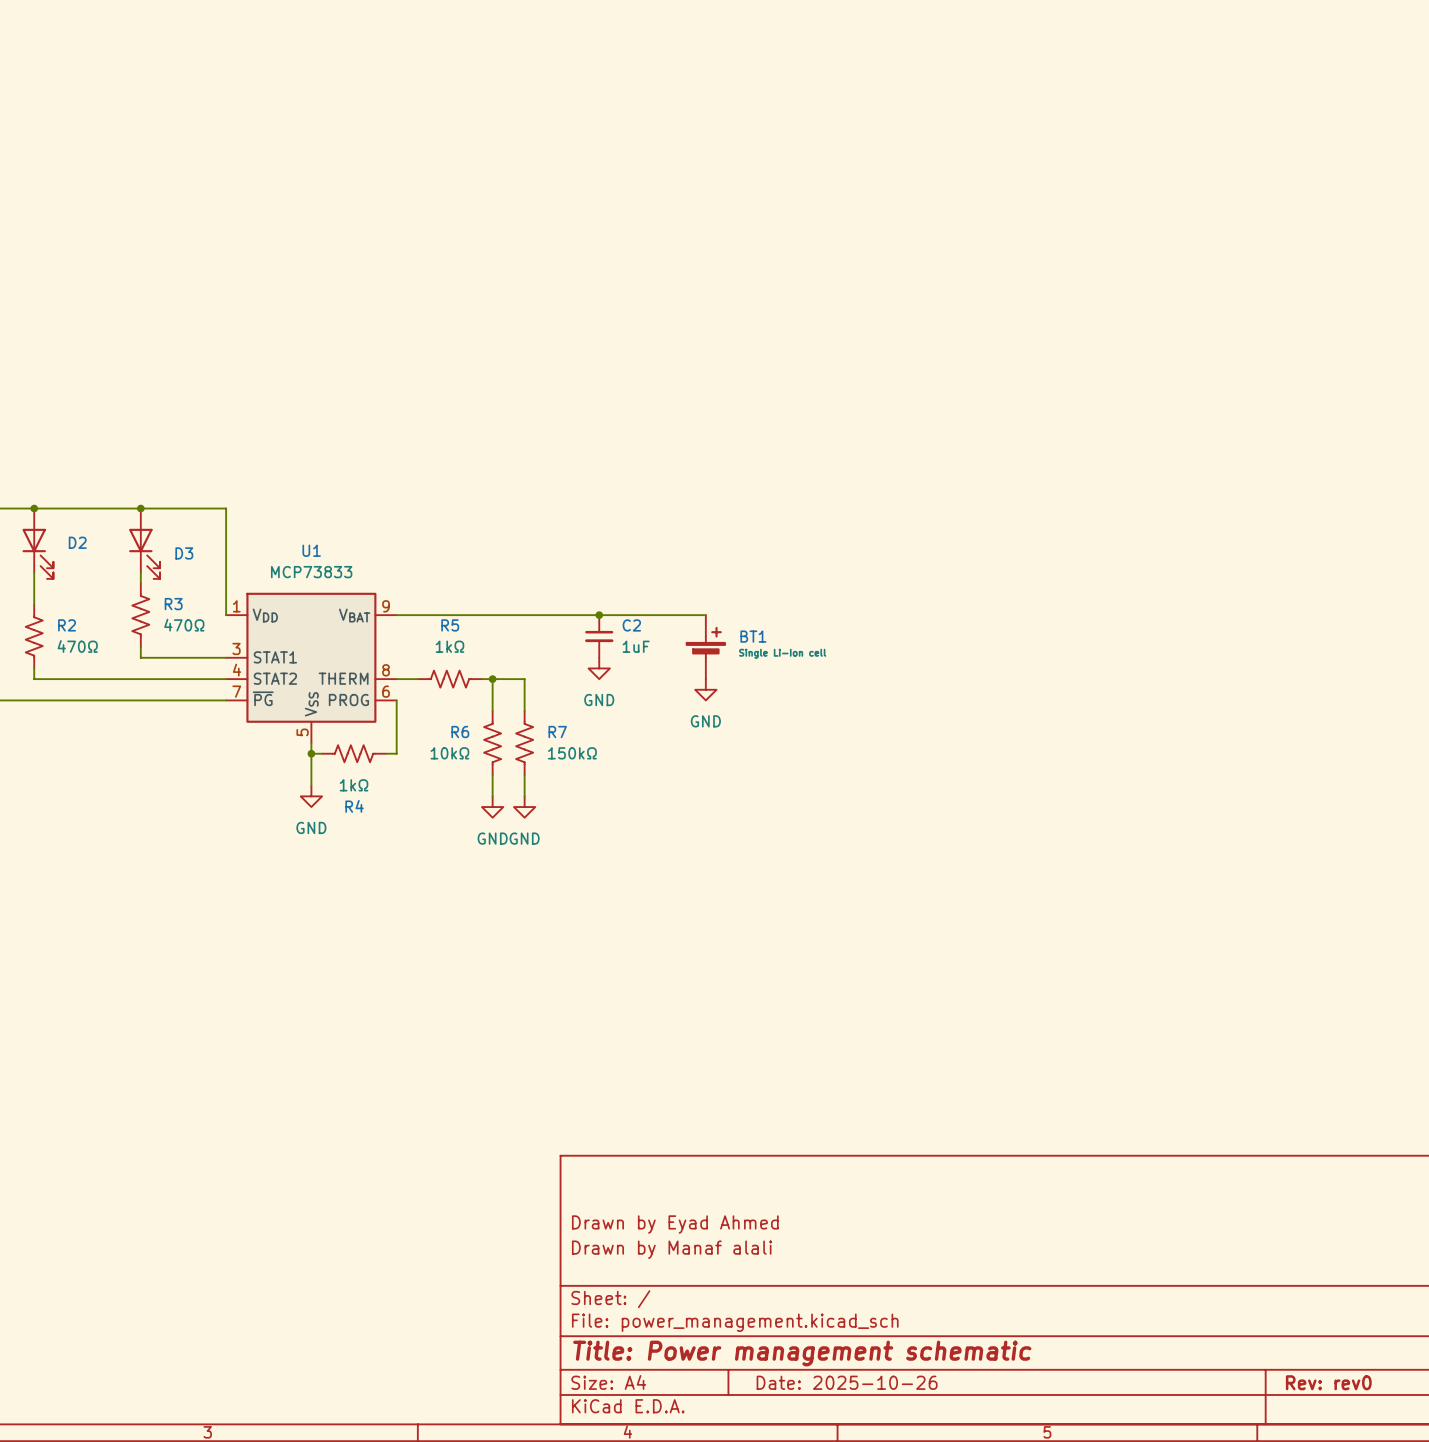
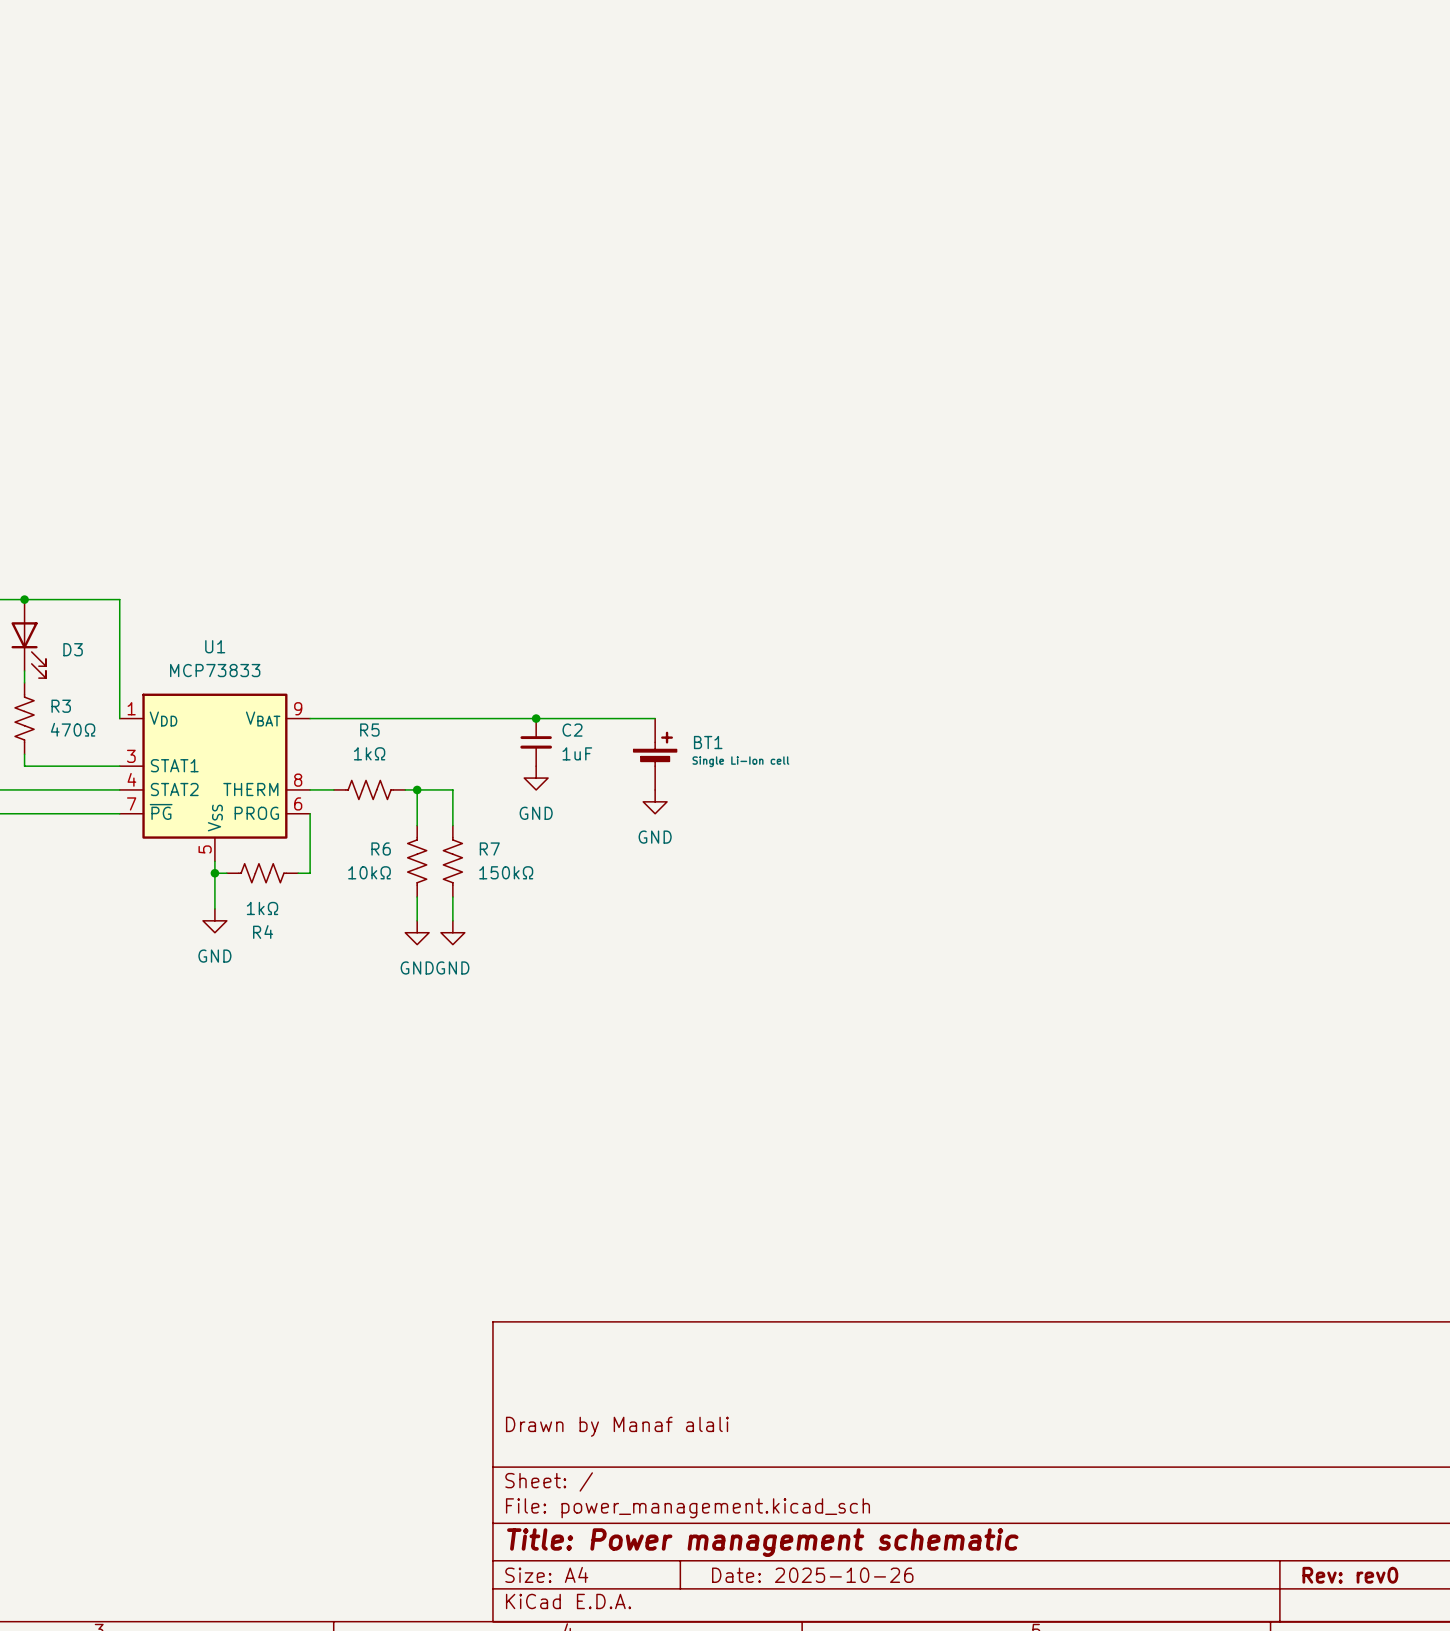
title block: Drawn by Eyad Ahmed (675, 1224) -> none

